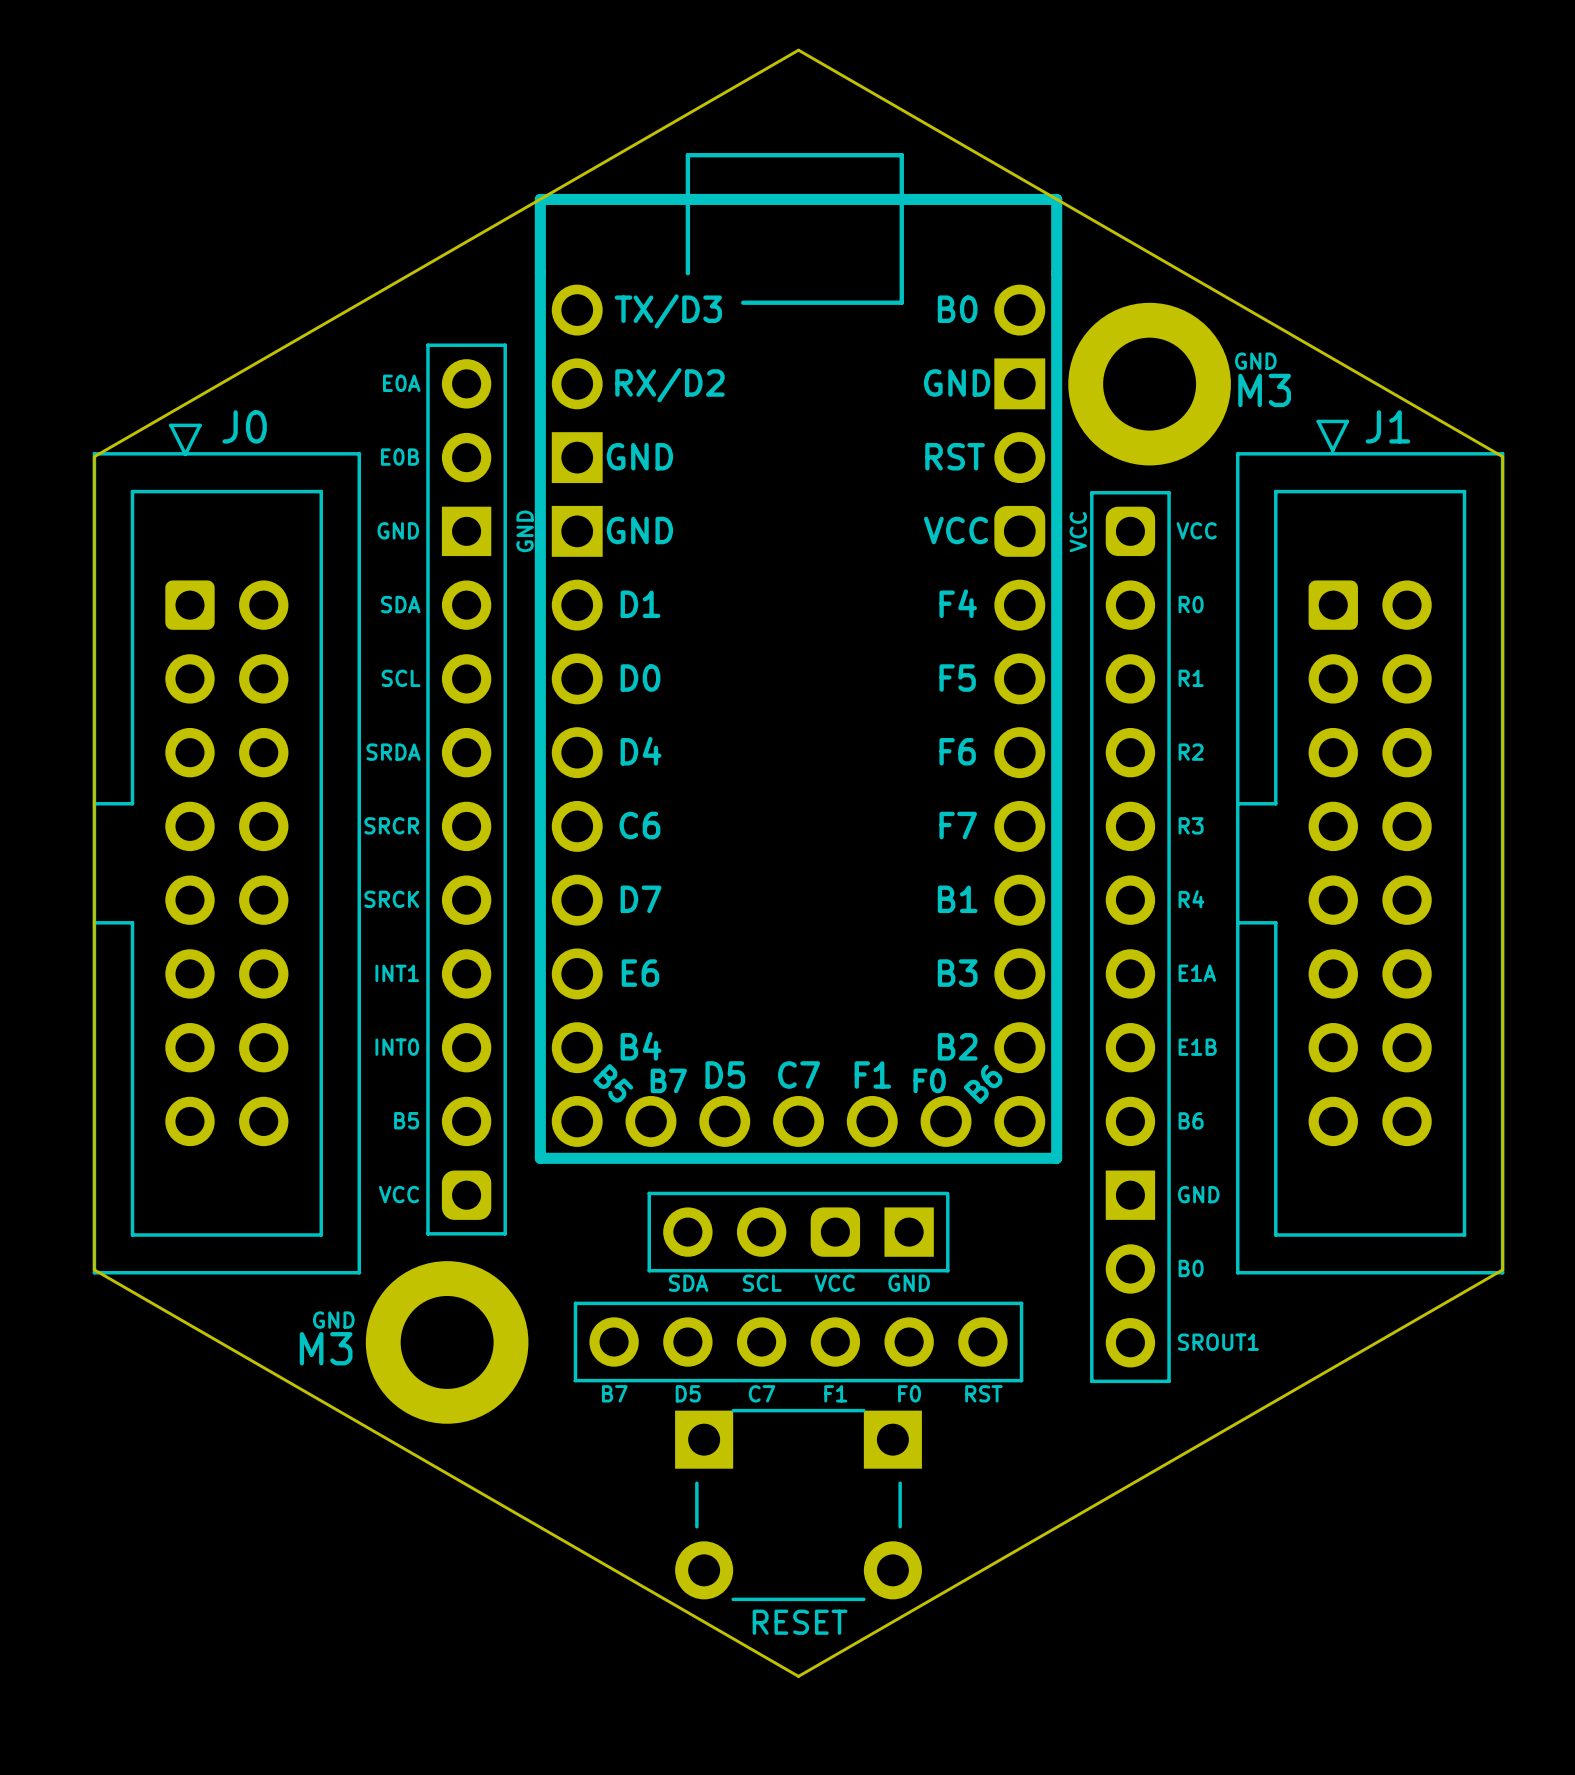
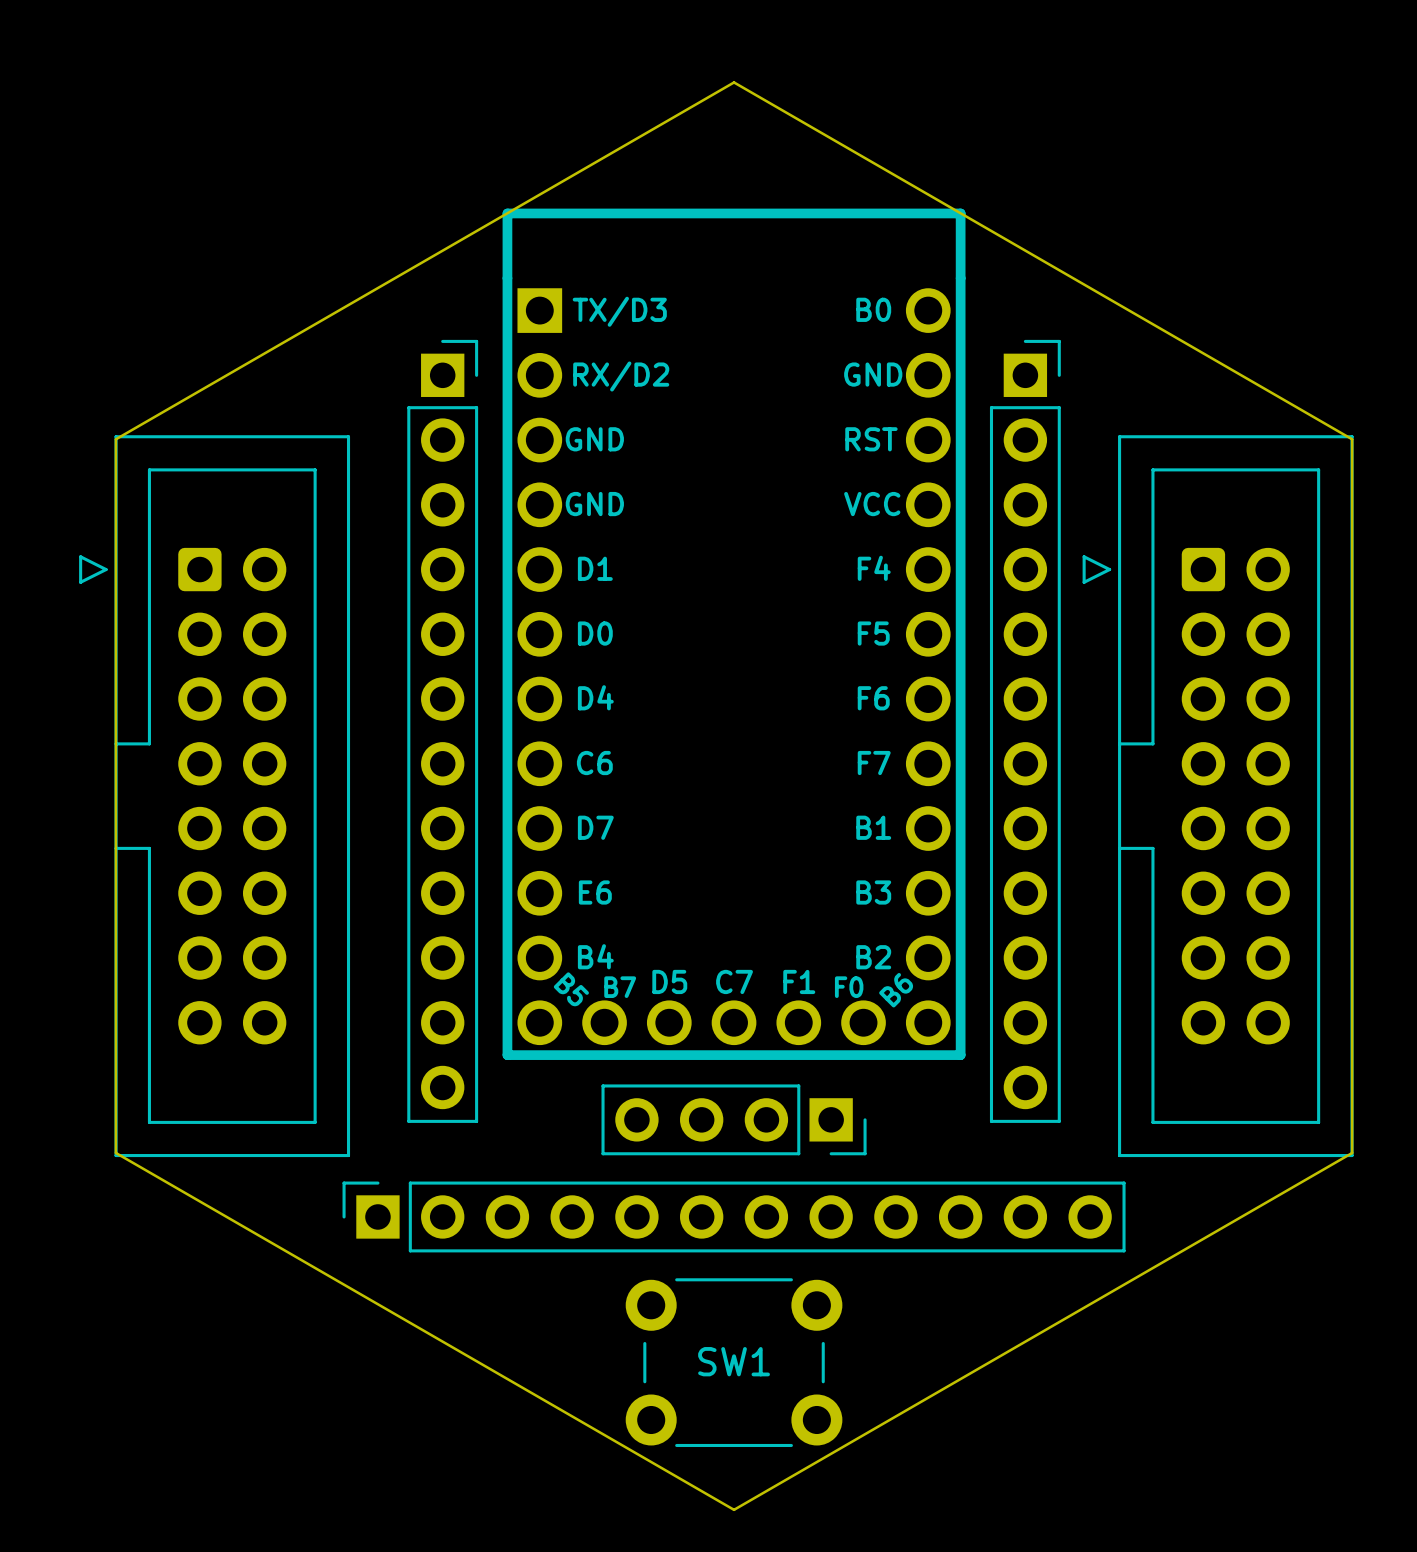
part footprint: [534, 193, 1063, 1164] -> [502, 208, 966, 1060]
line: (687, 273) (687, 155) (901, 155) (901, 302) (743, 302) -> none
part footprint: [426, 343, 507, 1236] -> [407, 339, 479, 1123]
text: GND (1255, 361) -> none
text: E0A (401, 383) -> none
part: M3 (1149, 384) -> none
text: E0B (400, 457) -> none
text: GND (398, 530) -> none
text: VCC (1196, 530) -> none
text: GND (525, 531) -> none
text: VCC (1078, 532) -> none
text: SDA (400, 604) -> none
text: R0 (1191, 604) -> none
text: SCL (401, 678) -> none
text: R1 (1191, 678) -> none
text: SRDA (393, 752) -> none
text: R2 (1191, 752) -> none
part: none -> (1025, 731)
text: SRCR (391, 825) -> none
text: R3 (1191, 825) -> none
J1: (1370, 847) -> none
J0: (226, 849) -> none
part: none -> (214, 796)
part: none -> (1218, 796)
text: SRCK (391, 899) -> none
text: R4 (1191, 899) -> none
part: (1130, 937) -> none
text: INT1 (397, 973) -> none
text: E1A (1197, 973) -> none
text: INT0 (397, 1047) -> none
text: E1B (1197, 1047) -> none
text: B5 (406, 1120) -> none
text: B6 (1191, 1120) -> none
part footprint: [647, 1191, 950, 1273] -> [601, 1084, 867, 1156]
text: VCC (398, 1194) -> none
text: GND (1198, 1194) -> none
text: B0 (1191, 1268) -> none
text: SDA (688, 1283) -> none
text: SCL (762, 1283) -> none
text: VCC (834, 1283) -> none
text: GND (909, 1283) -> none
part footprint: [573, 1301, 1024, 1383] -> [342, 1181, 1126, 1253]
text: GND (333, 1320) -> none
part: M3 (447, 1342) -> none
text: SROUT1 (1218, 1342) -> none
text: B7 (614, 1393) -> none
text: D5 (688, 1393) -> none
text: C7 (761, 1393) -> none
text: F1 (835, 1393) -> none
text: F0 (909, 1393) -> none
text: RST (983, 1393) -> none
part: (798, 1505) -> none
SW1: none -> (734, 1362)
text: RESET (800, 1622) -> none

